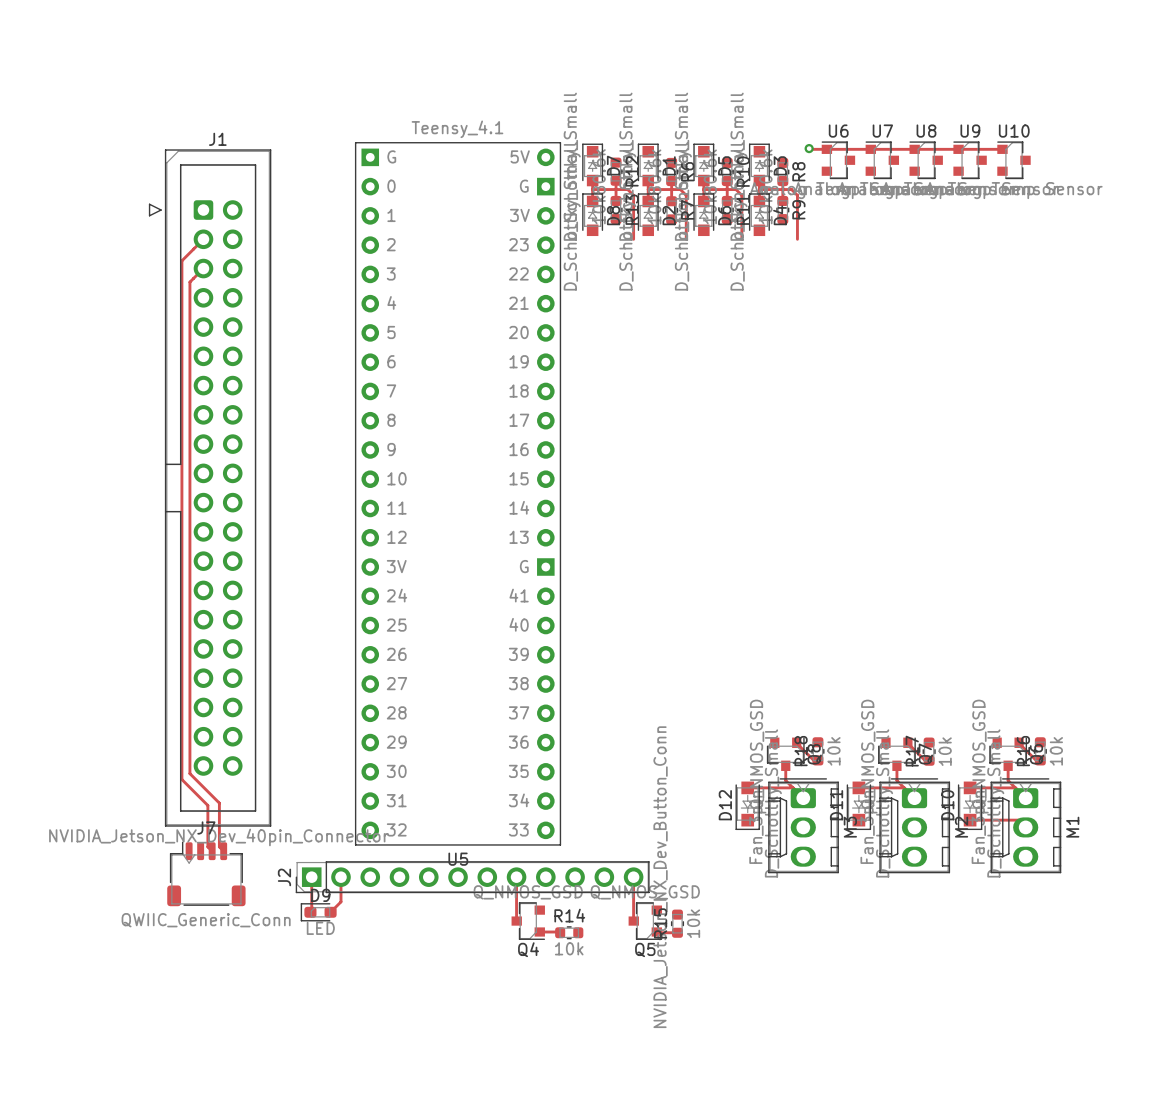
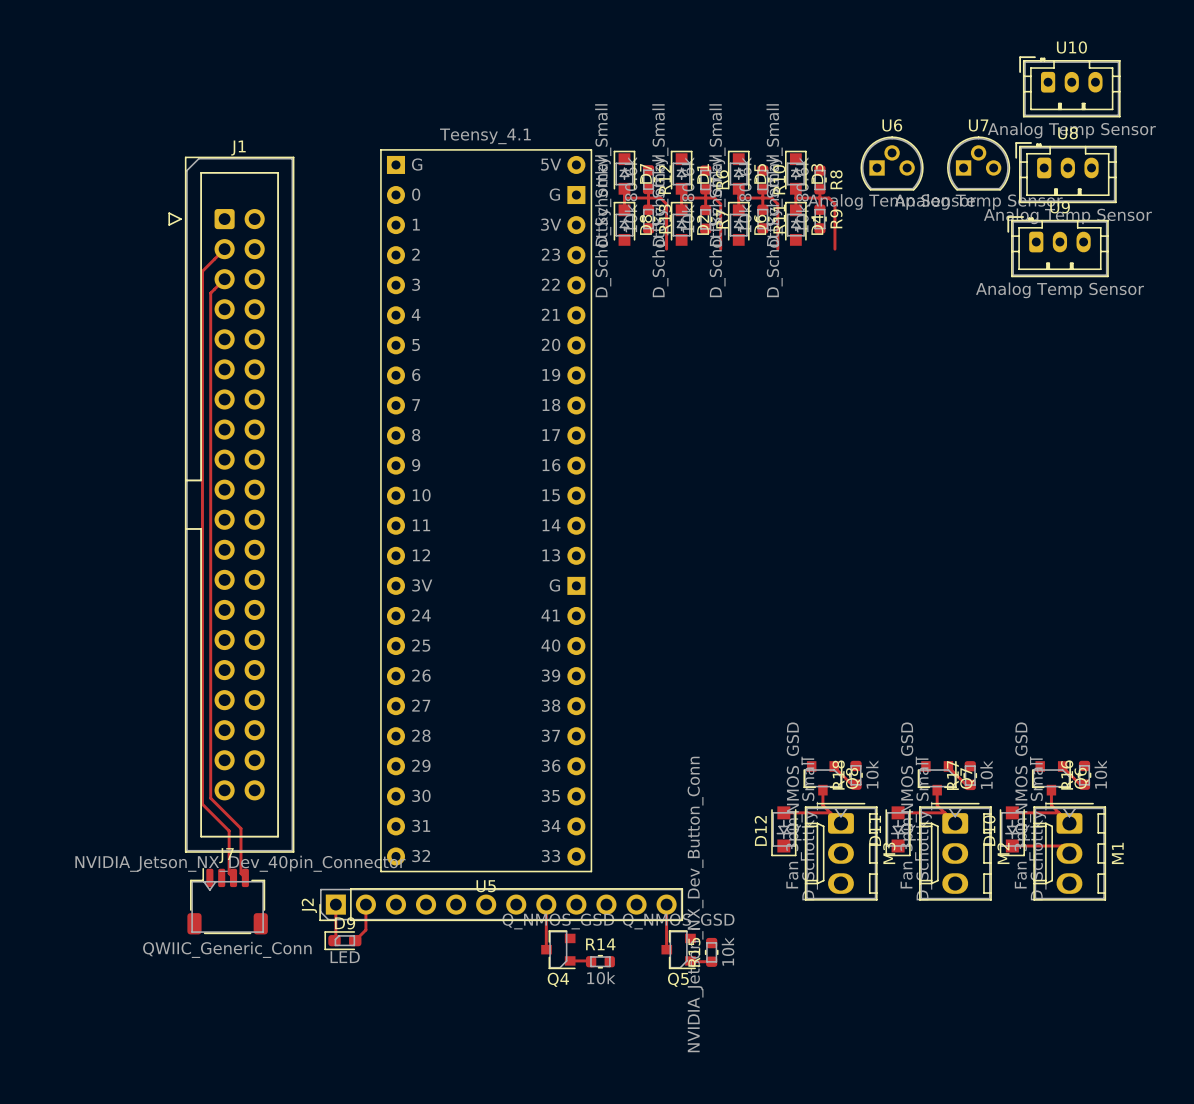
U6 footprint: [821, 141, 856, 180] -> [860, 136, 924, 191]
U7 footprint: [865, 141, 900, 180] -> [947, 136, 1011, 191]
U8 footprint: [909, 141, 943, 180] -> [1015, 142, 1117, 204]
U9 footprint: [953, 141, 987, 180] -> [1007, 216, 1109, 278]
U10 footprint: [997, 141, 1031, 180] -> [1019, 56, 1121, 118]
track: (809, 148) (1002, 149) -> none
via: (809, 148) -> none

